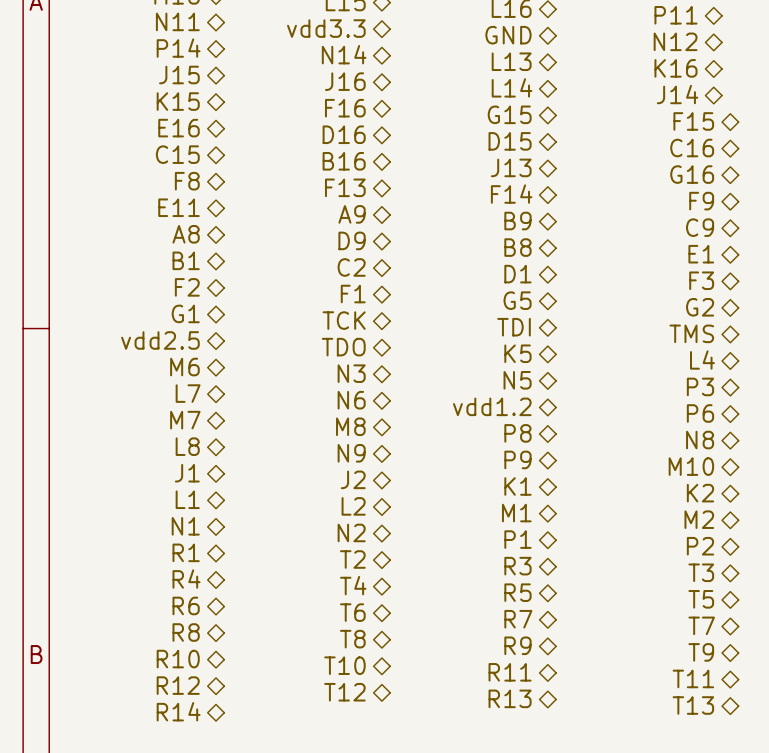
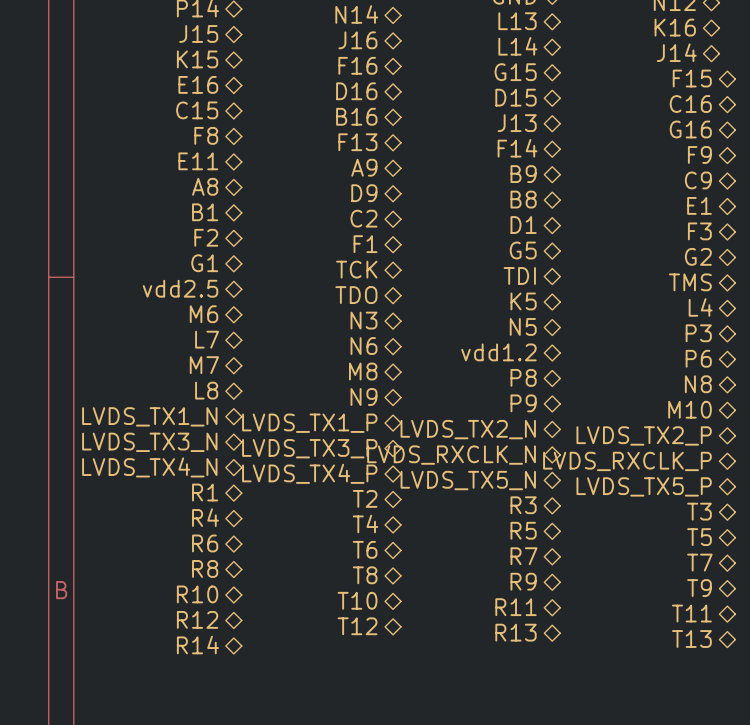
hierarchical label: J1 (187, 473) -> LVDS_TX1_N (149, 416)
hierarchical label: J2 (353, 479) -> LVDS_TX1_P (309, 423)
hierarchical label: K1 (517, 486) -> LVDS_TX2_N (468, 429)
hierarchical label: K2 (700, 493) -> LVDS_TX2_P (644, 435)
hierarchical label: L1 (187, 499) -> LVDS_TX3_N (149, 442)
hierarchical label: L2 (353, 506) -> LVDS_TX3_P (309, 448)
hierarchical label: M1 (516, 513) -> LVDS_RXCLK_N (451, 455)
hierarchical label: M2 (699, 519) -> LVDS_RXCLK_P (627, 461)
hierarchical label: N1 (185, 526) -> LVDS_TX4_N (149, 467)
hierarchical label: N2 (351, 532) -> LVDS_TX4_P (309, 473)
hierarchical label: P1 (517, 539) -> LVDS_TX5_N (468, 480)
hierarchical label: P2 (700, 546) -> LVDS_TX5_P (644, 486)

